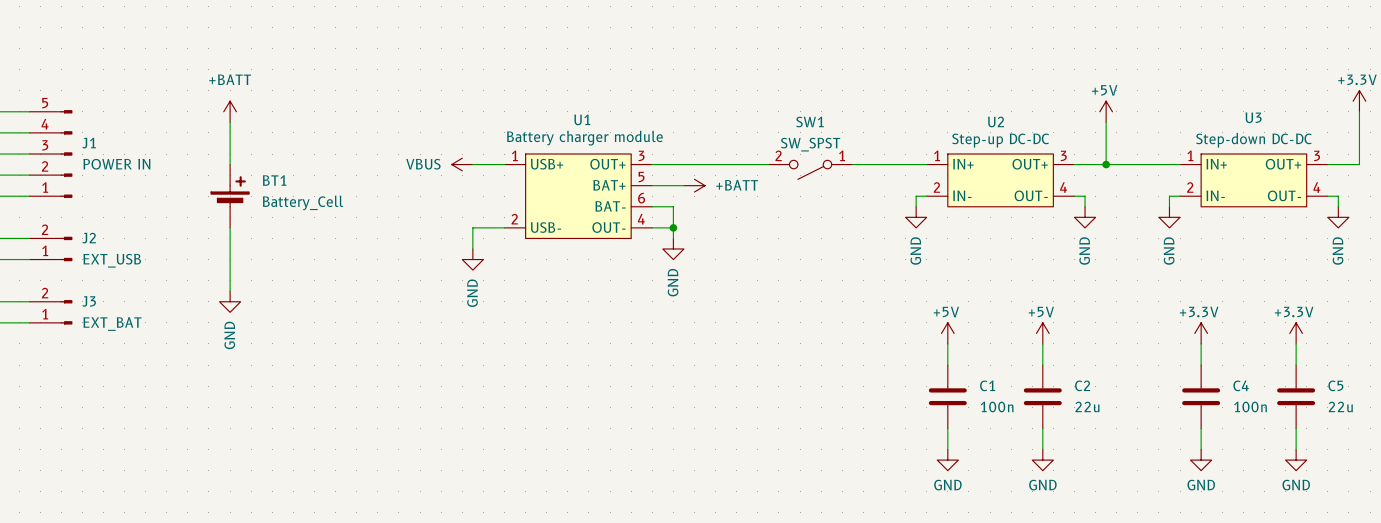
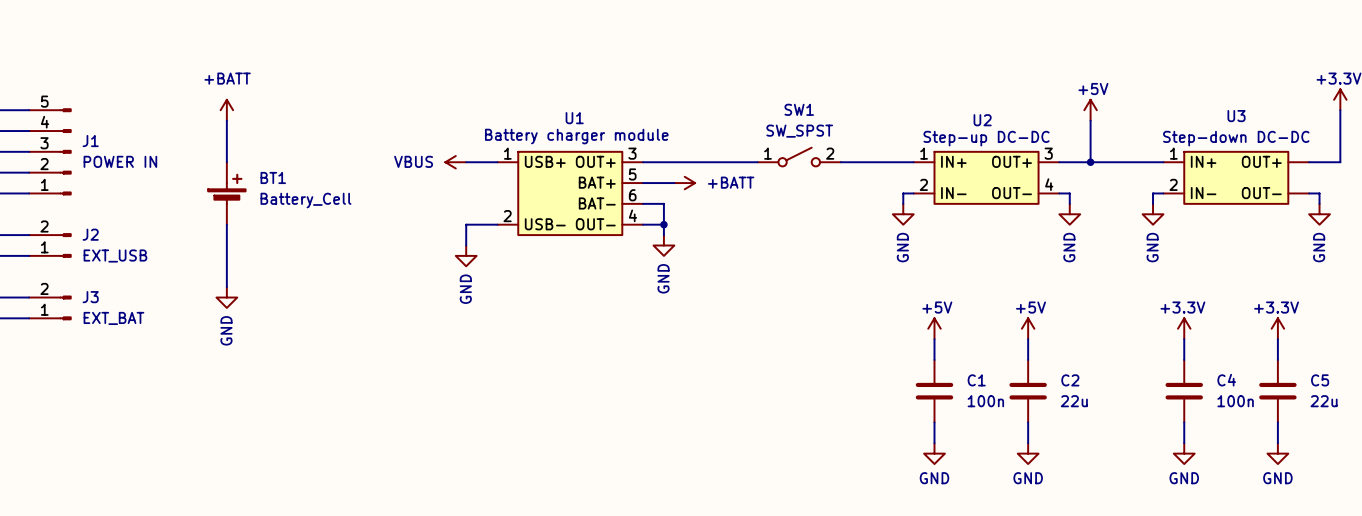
U3 pin number: 3 (1317, 155) -> none
SW1 rotation: 0° (810, 169) -> 180° (799, 157)
U3 pin number: 4 (1316, 187) -> none

